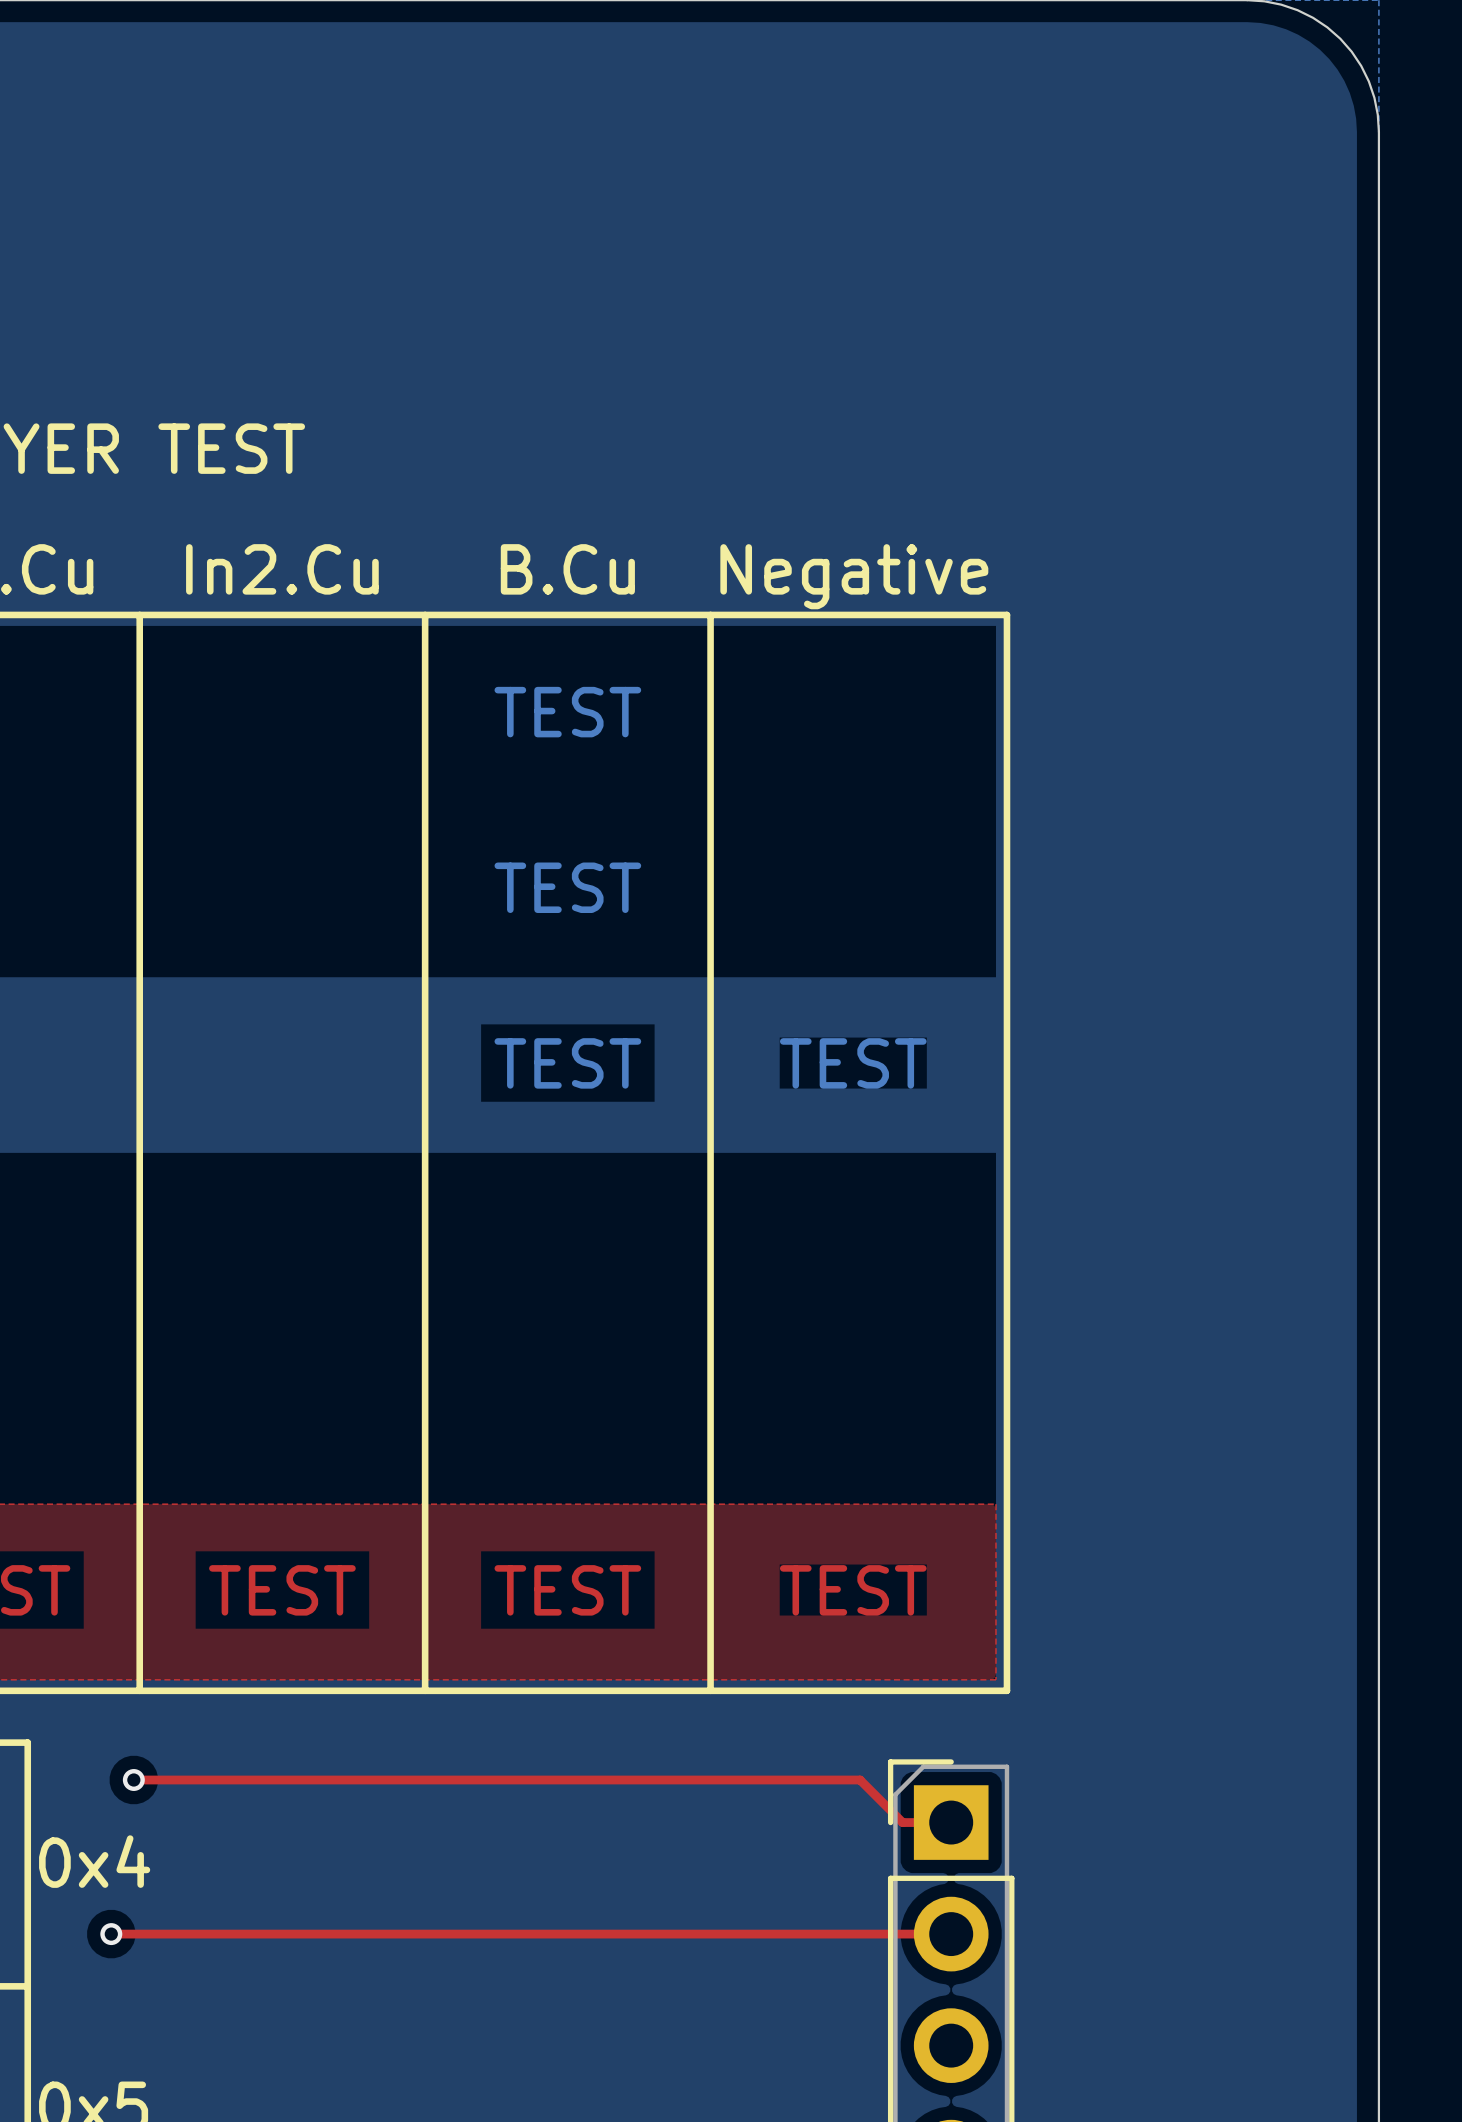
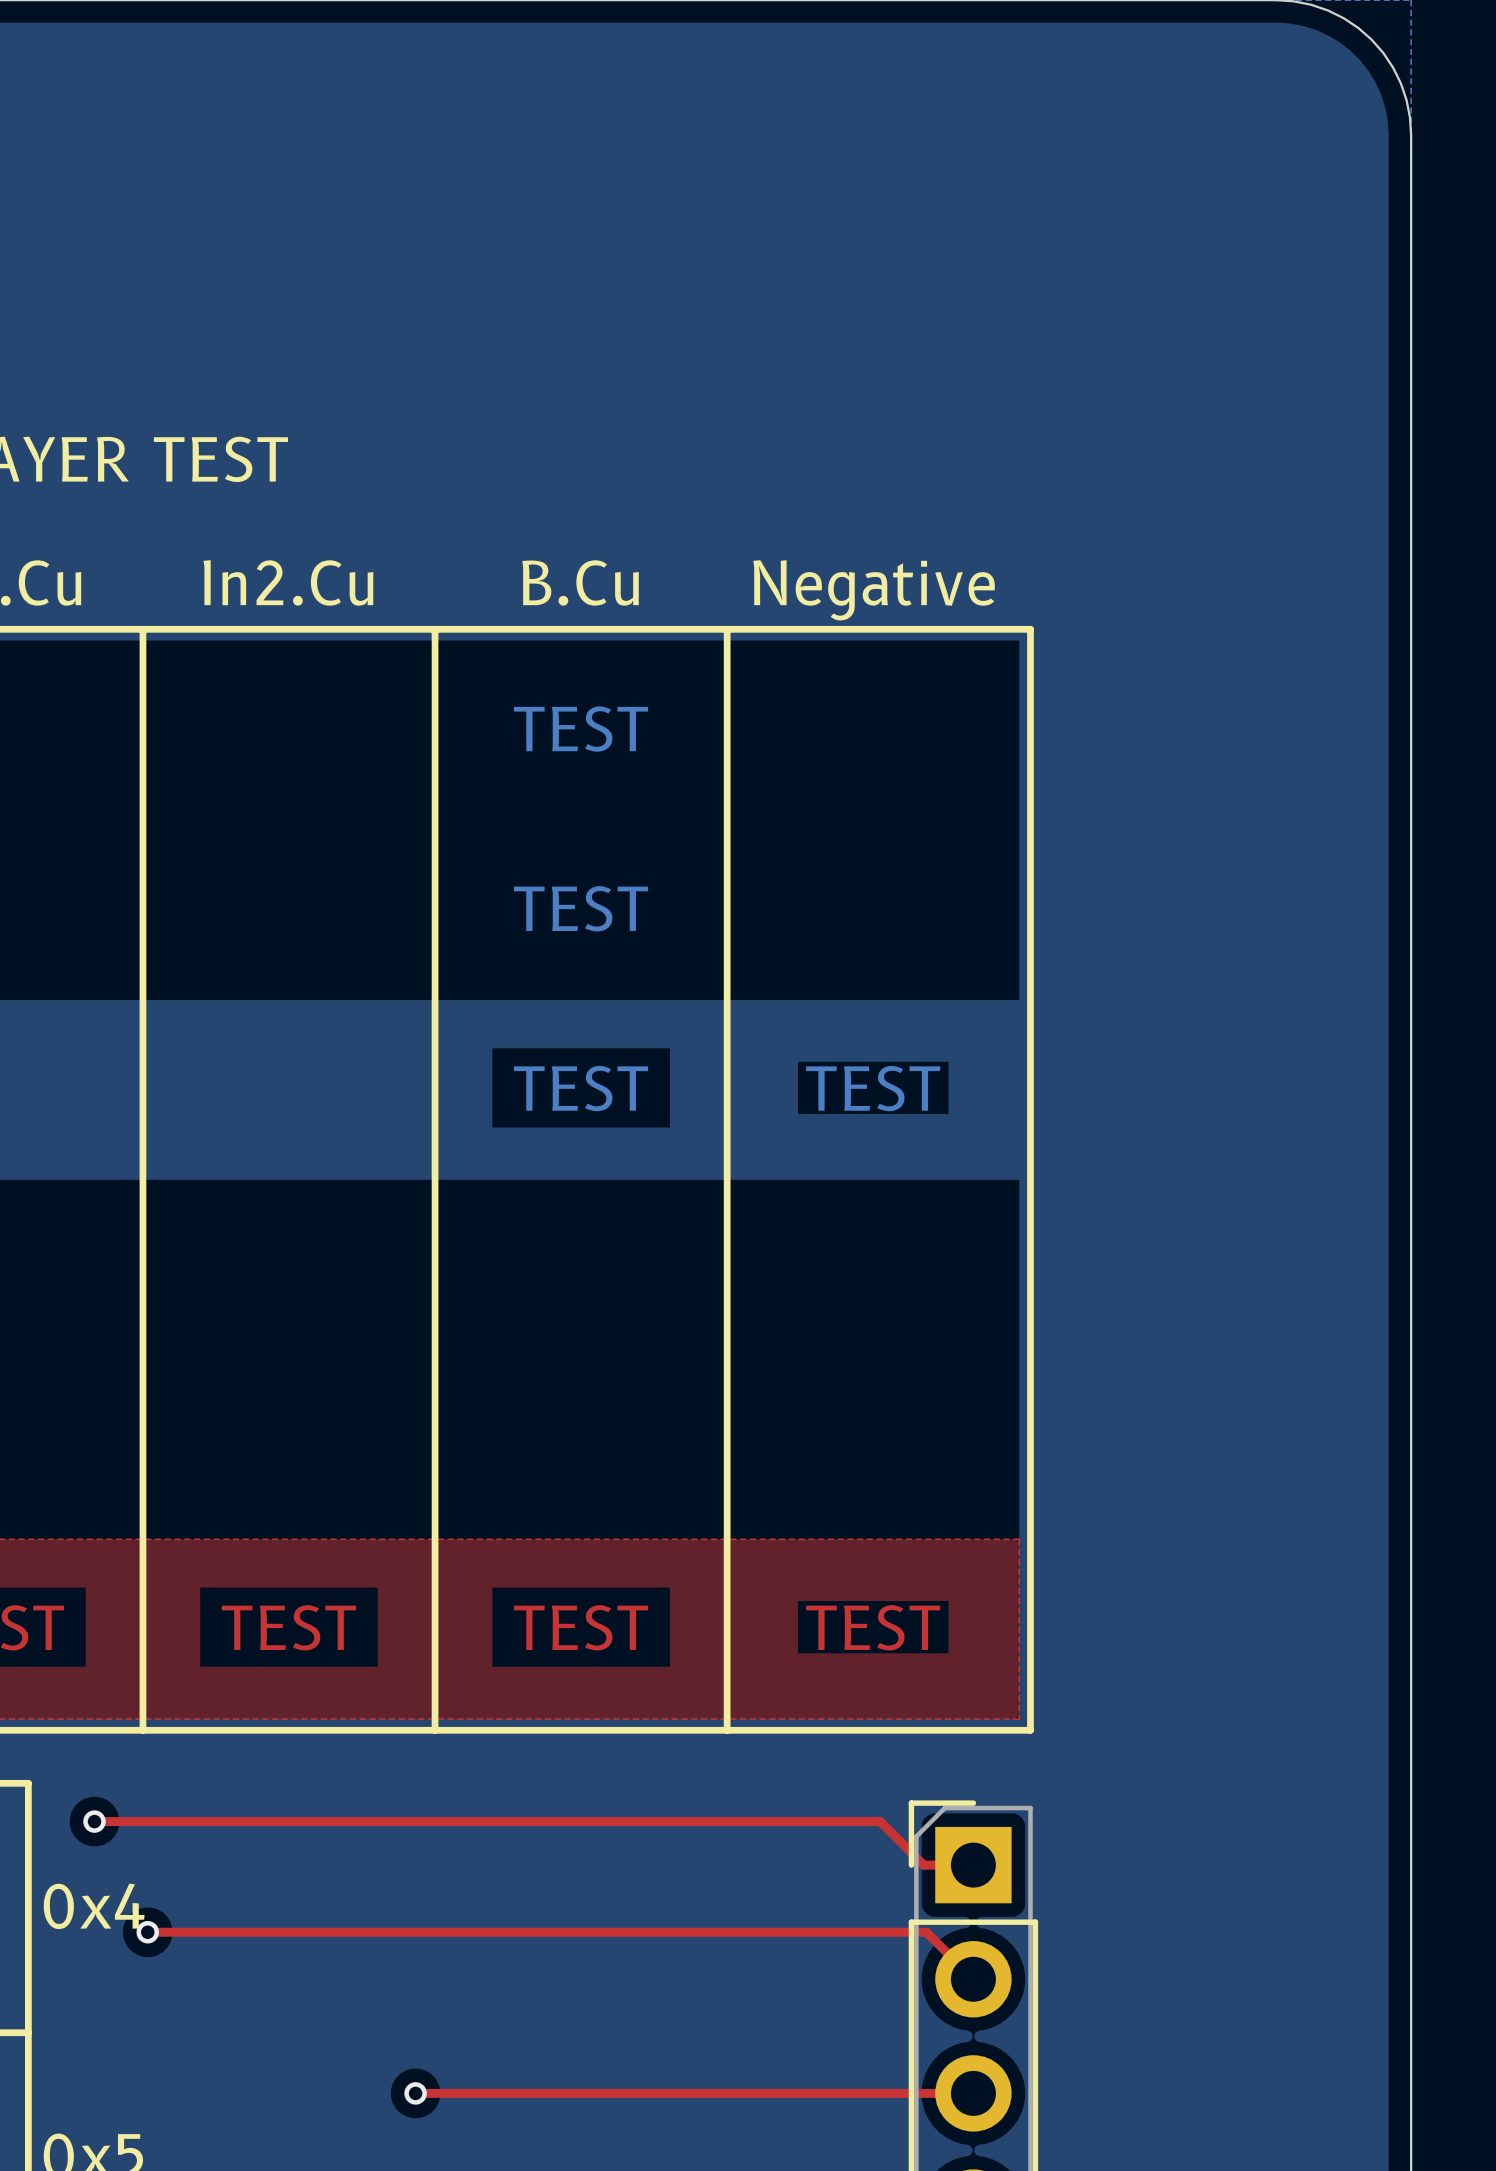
top track: none -> (94, 1821) (136, 1821)
via position: (133, 1780) -> (94, 1821)
via: none -> (147, 1932)
top track: (111, 1934) (951, 1934) -> (147, 1932) (926, 1932) (973, 1979)
via: (111, 1934) -> none
top track: none -> (415, 2093) (973, 2093)
via: none -> (415, 2093)

